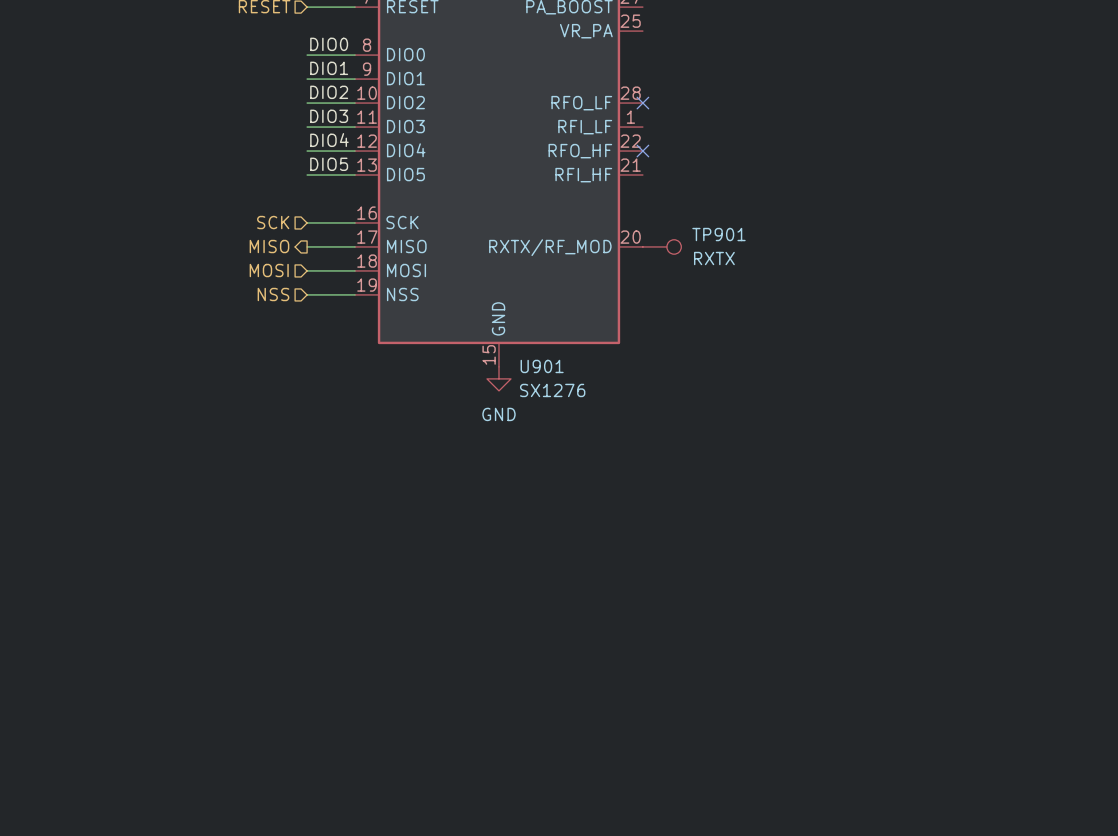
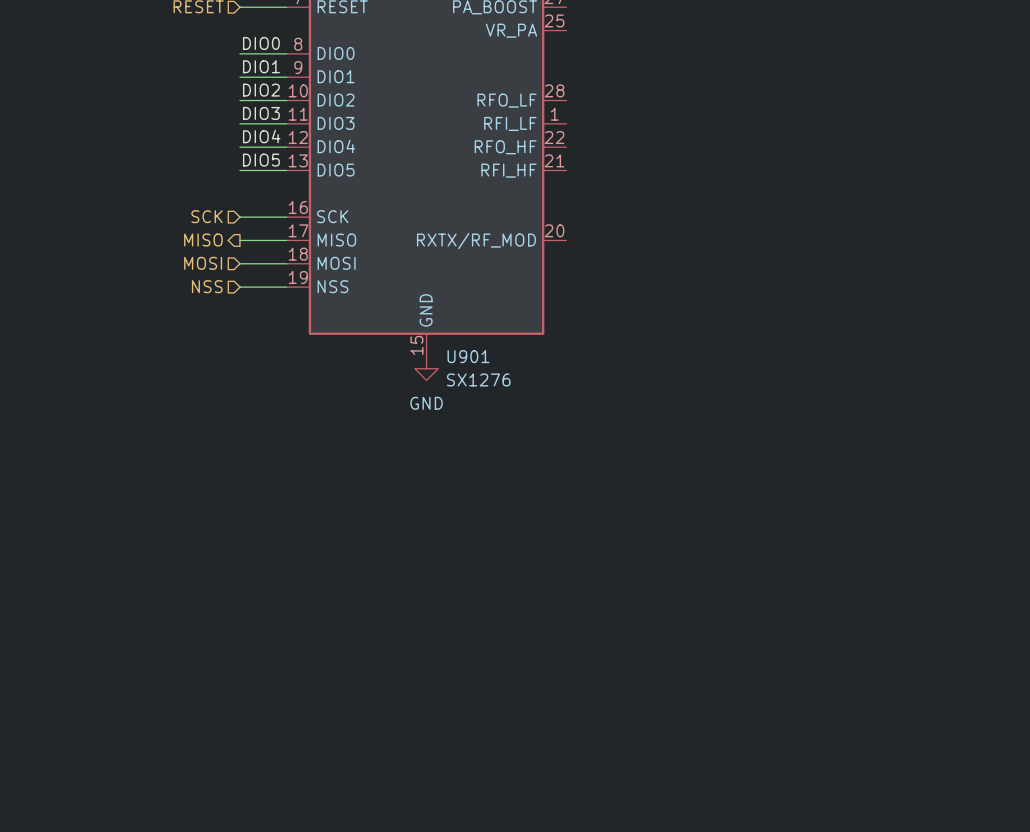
no-connect mark: (642, 103) -> none
no-connect mark: (642, 151) -> none
TP901: RXTX (662, 246) -> none

